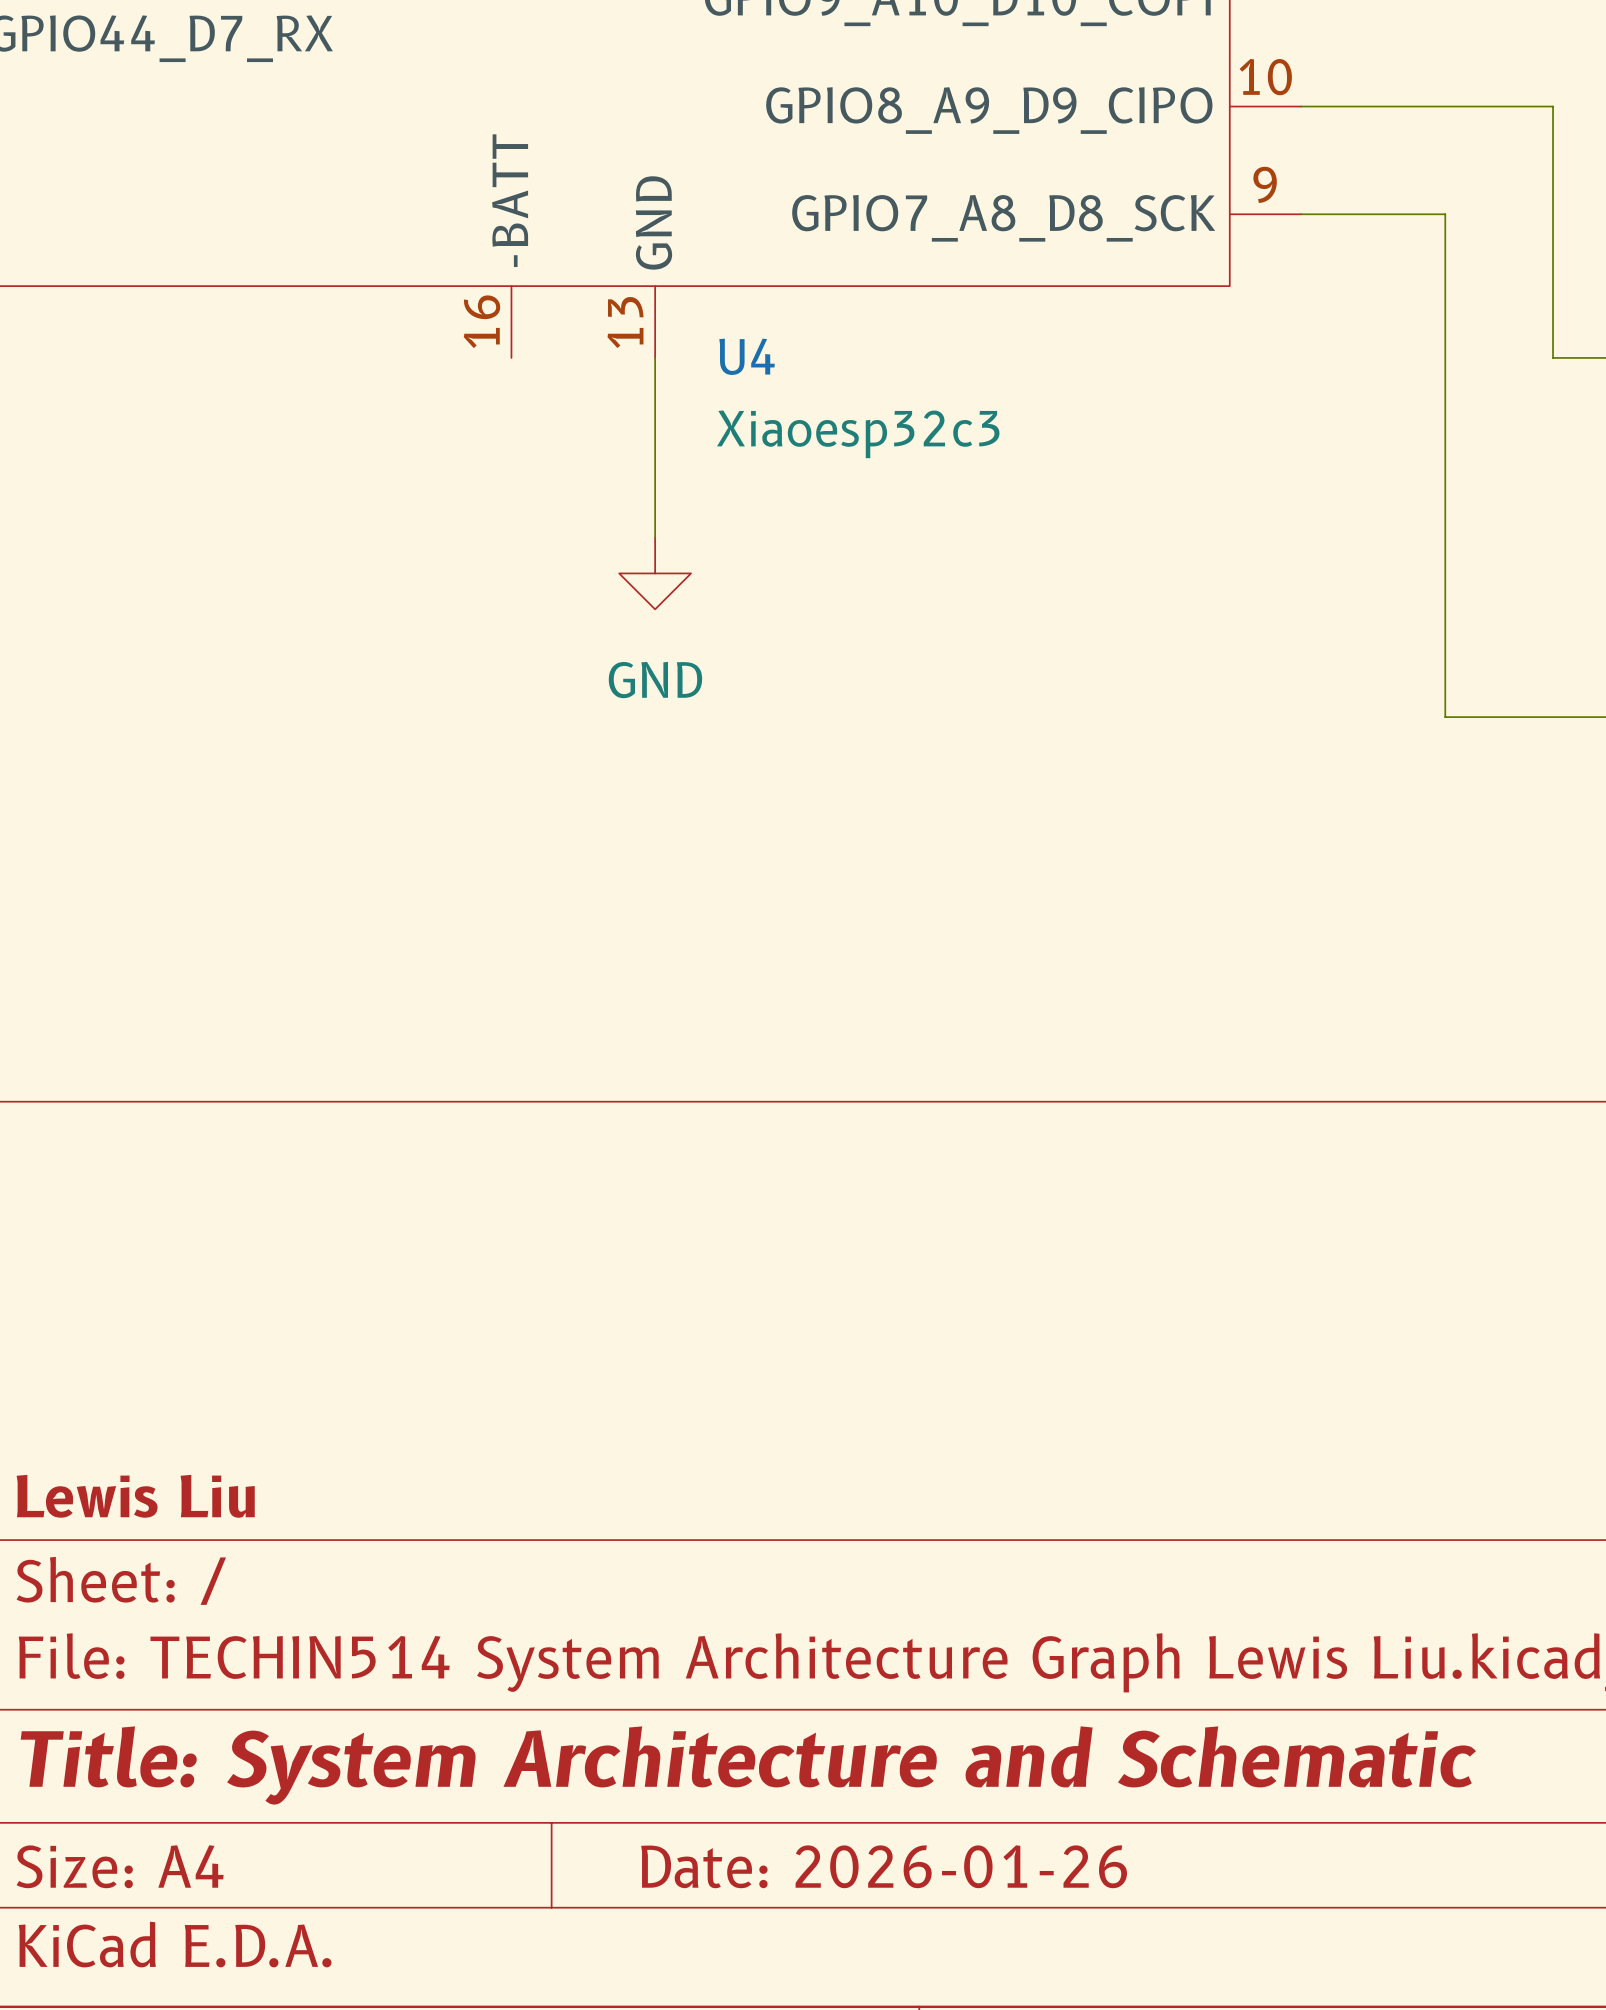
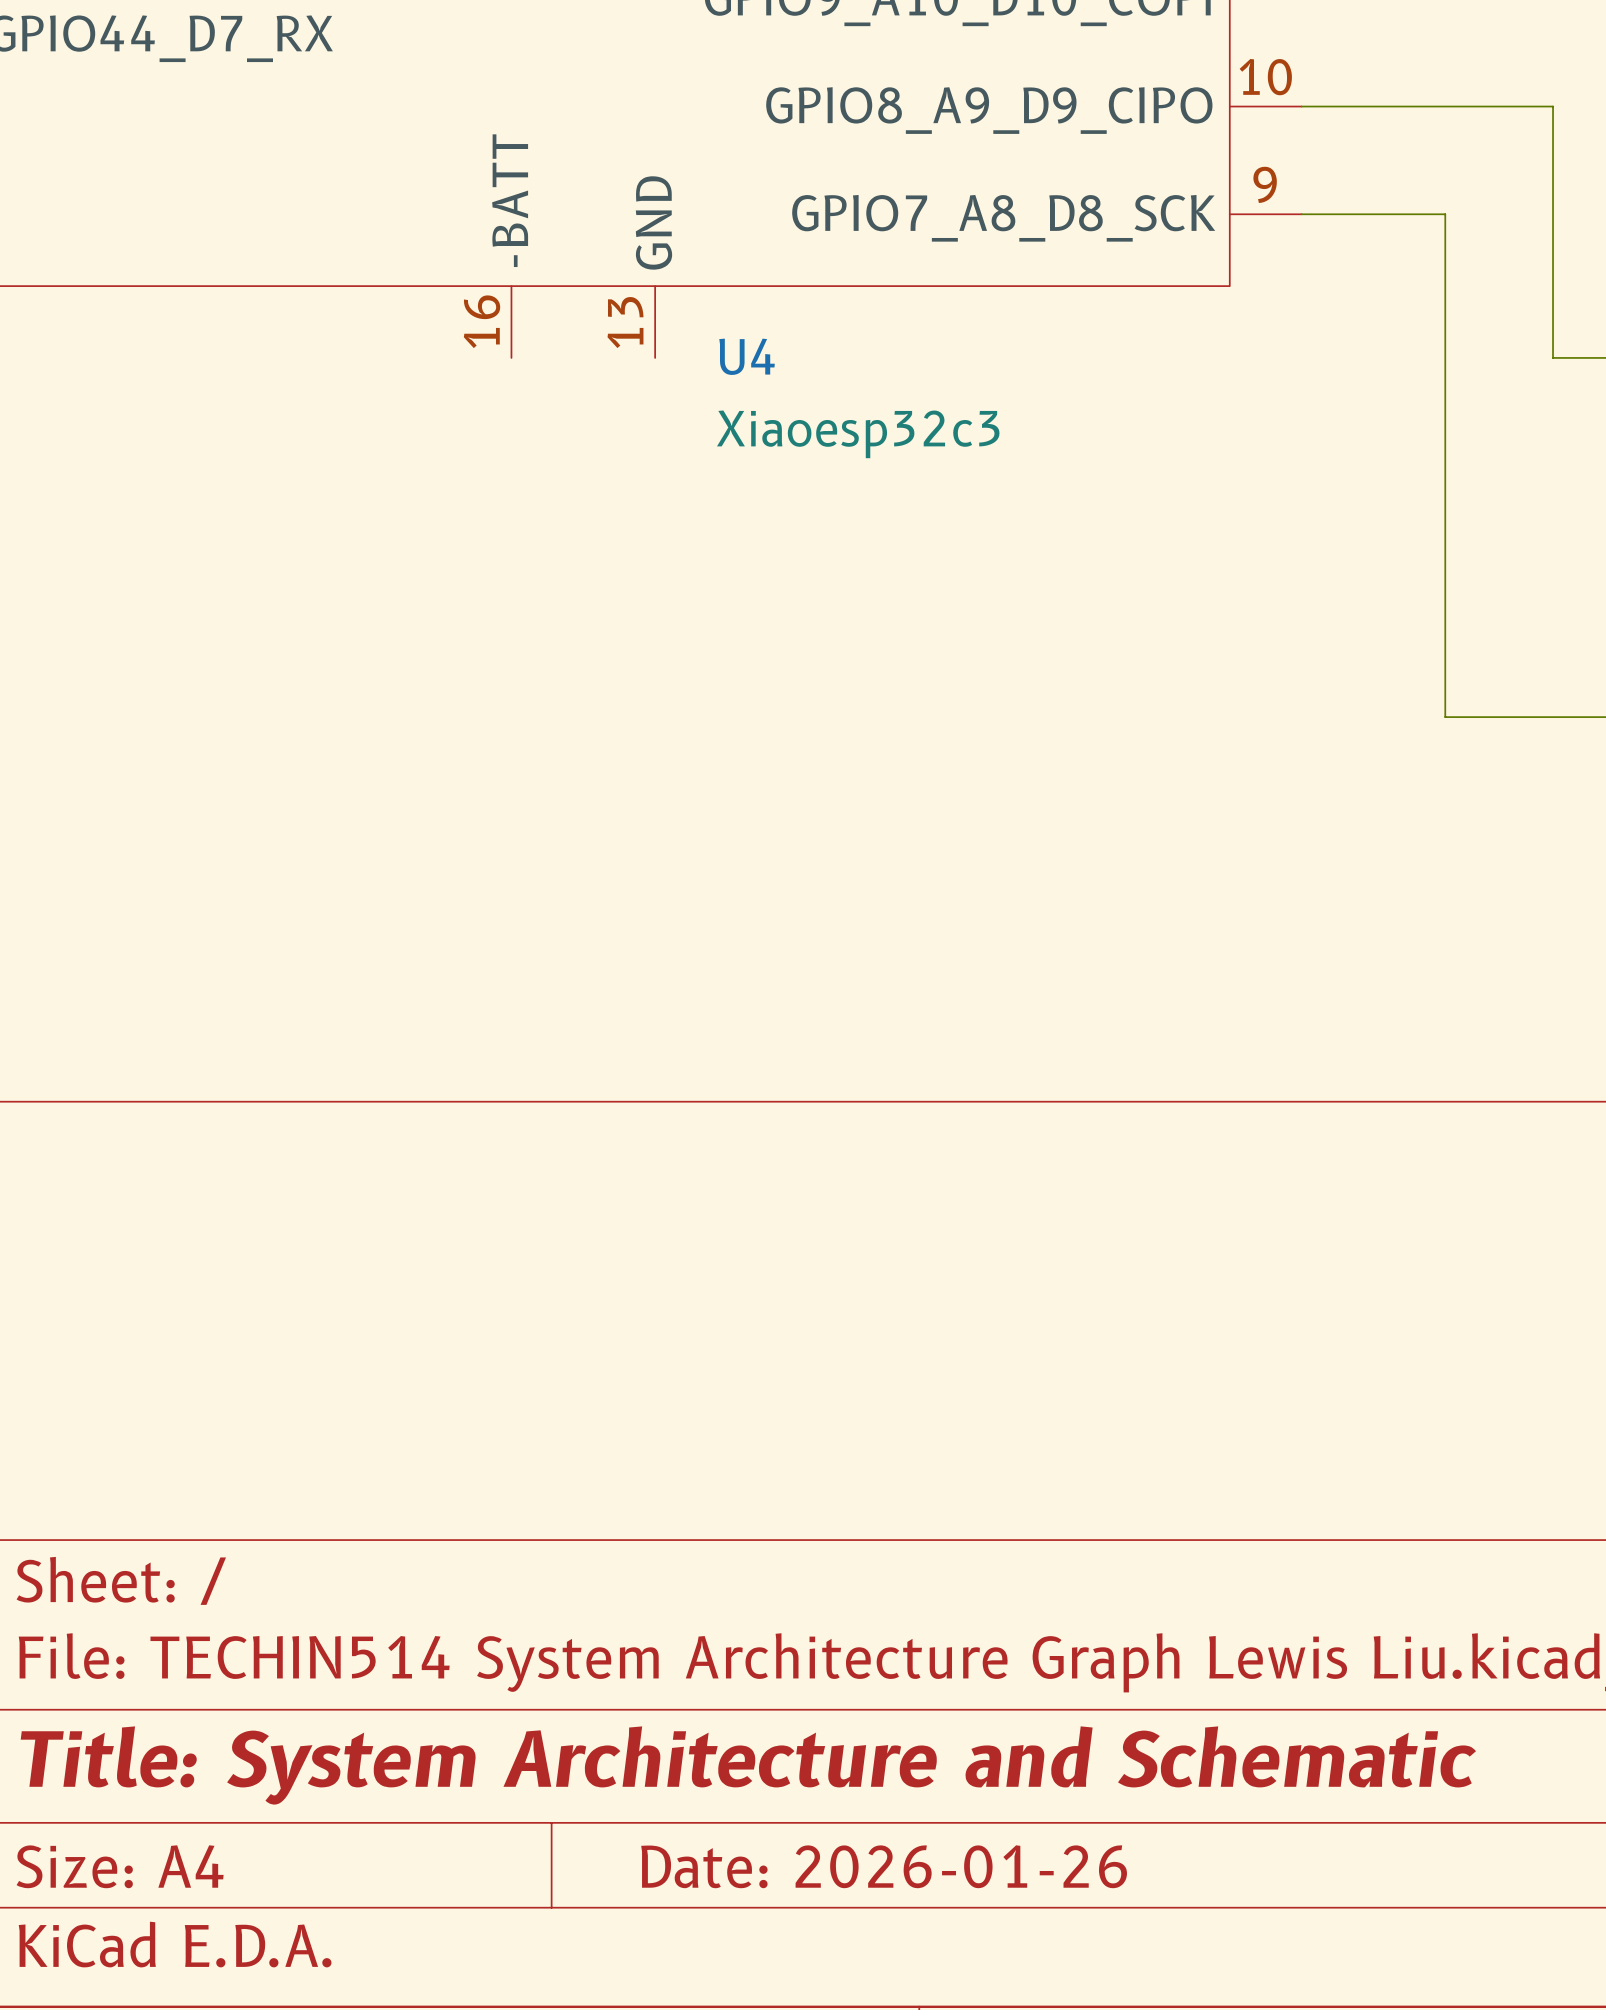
wire: (655, 357) (655, 537) -> none
power symbol: GND (655, 573) -> none
title block: Lewis Liu (135, 1496) -> none

